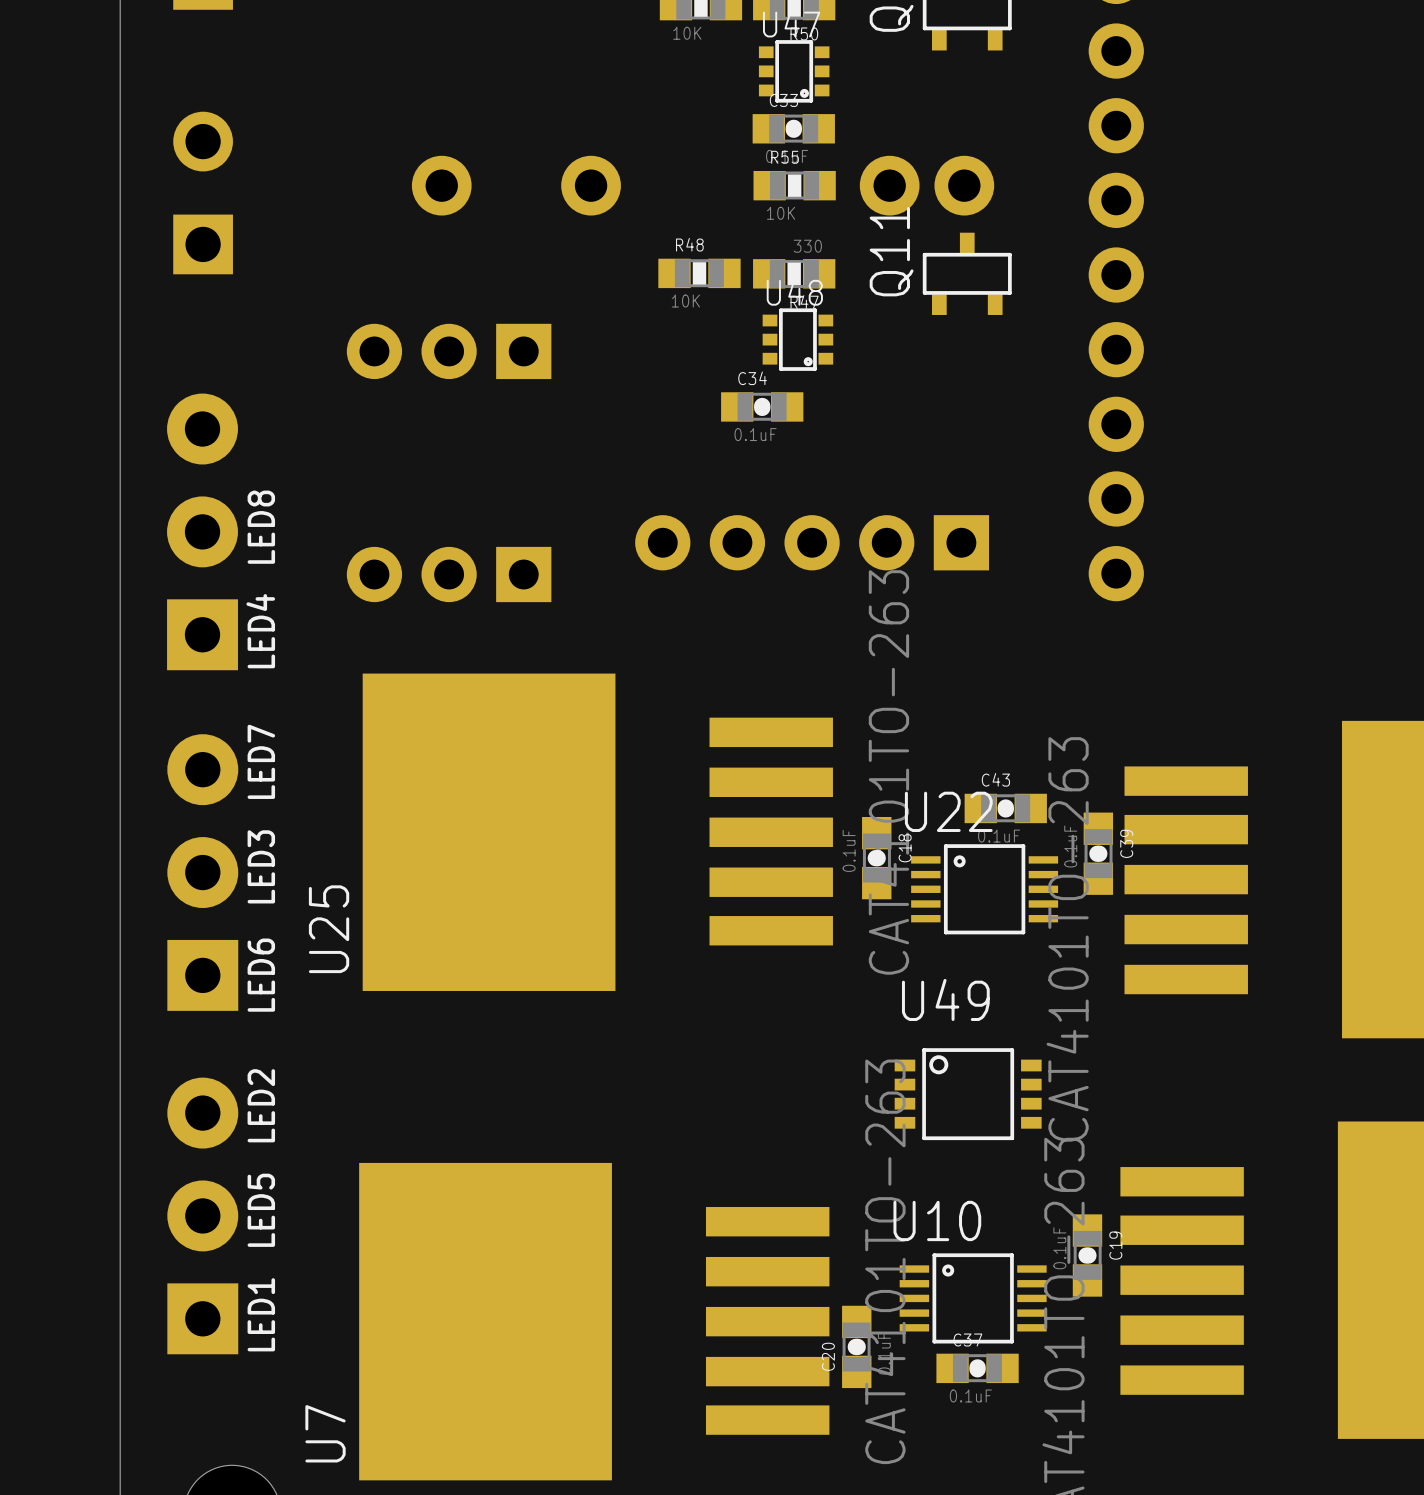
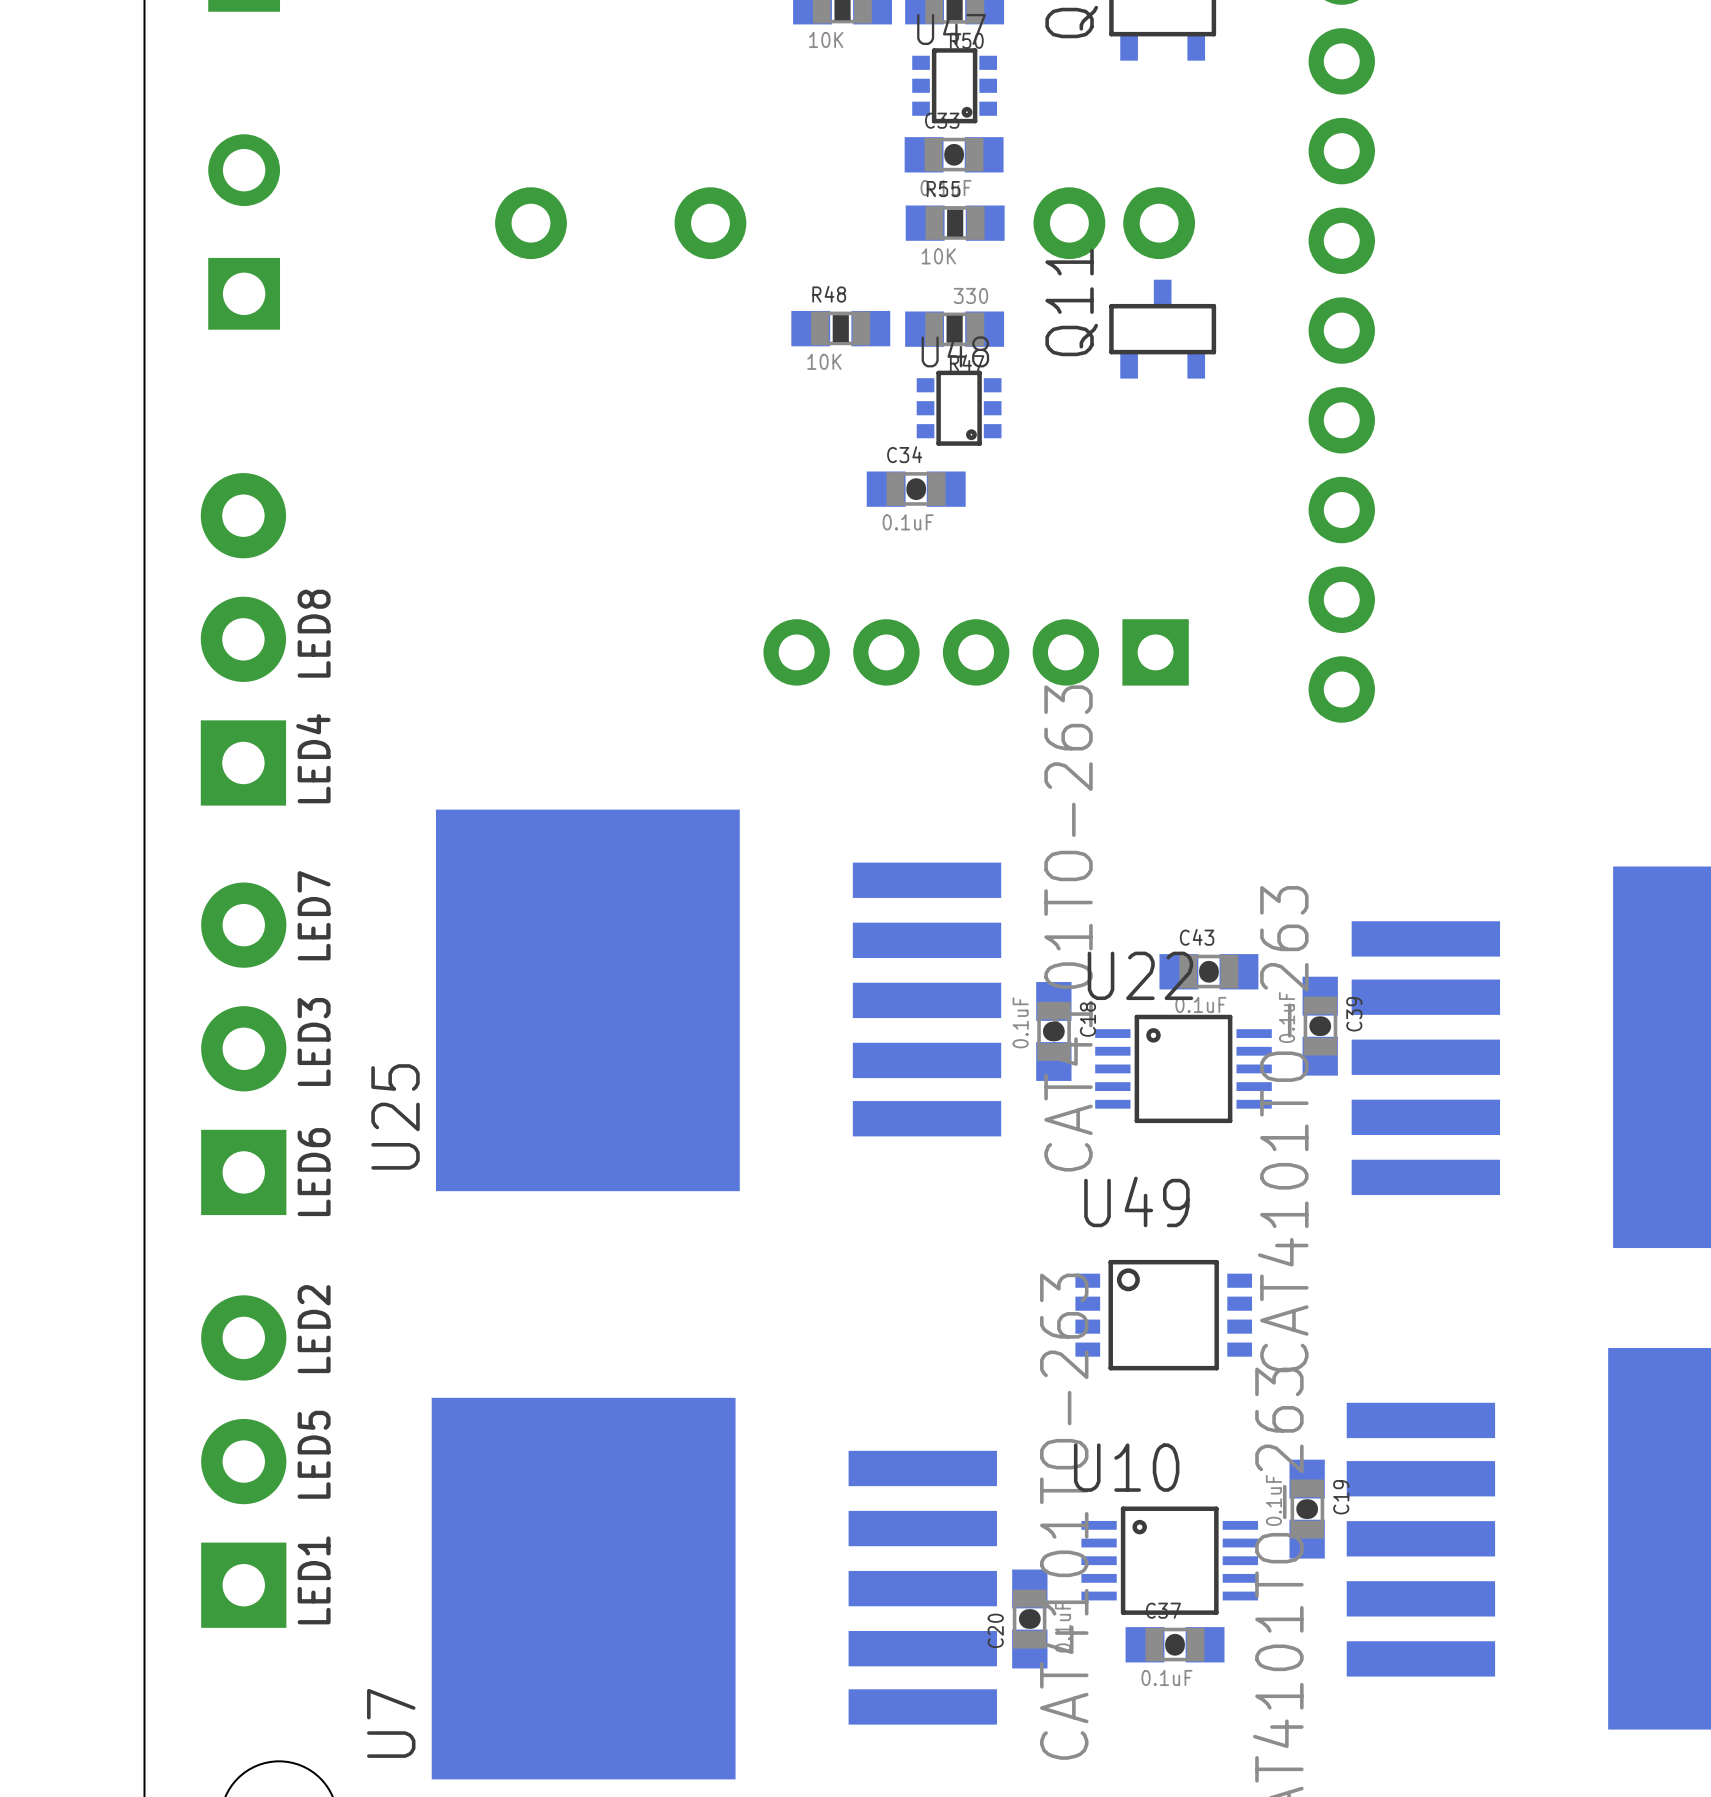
part: (449, 351) -> none
part: (449, 574) -> none

